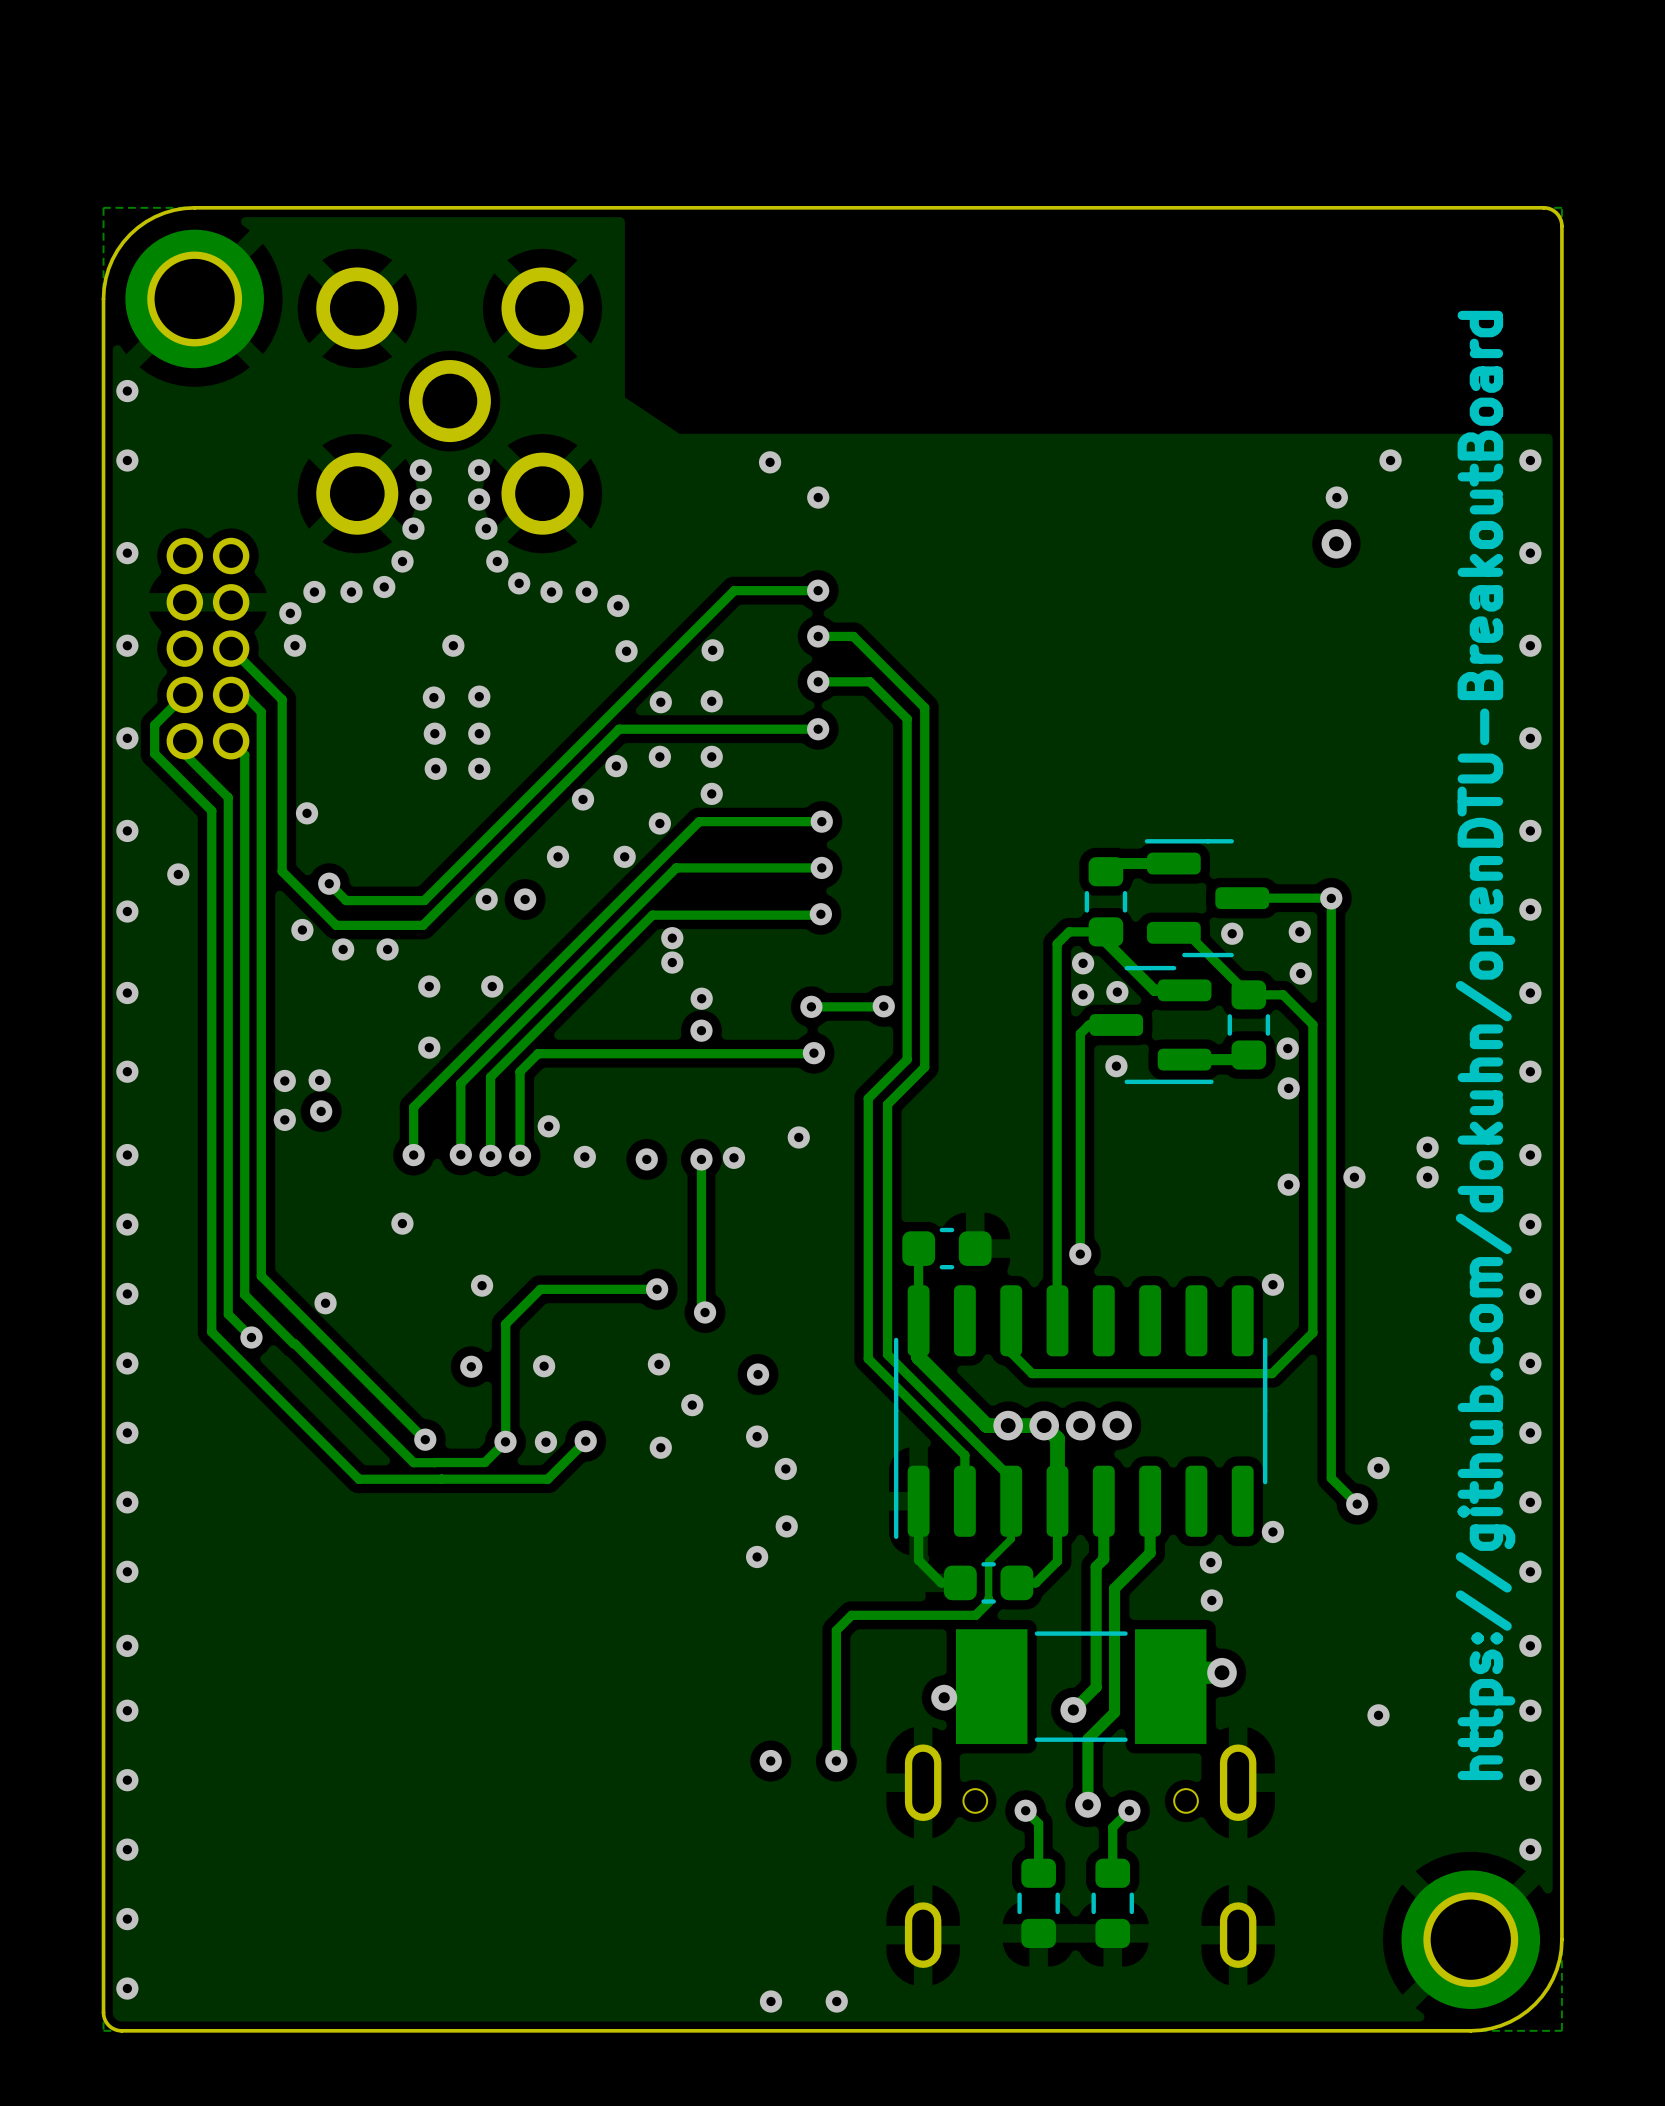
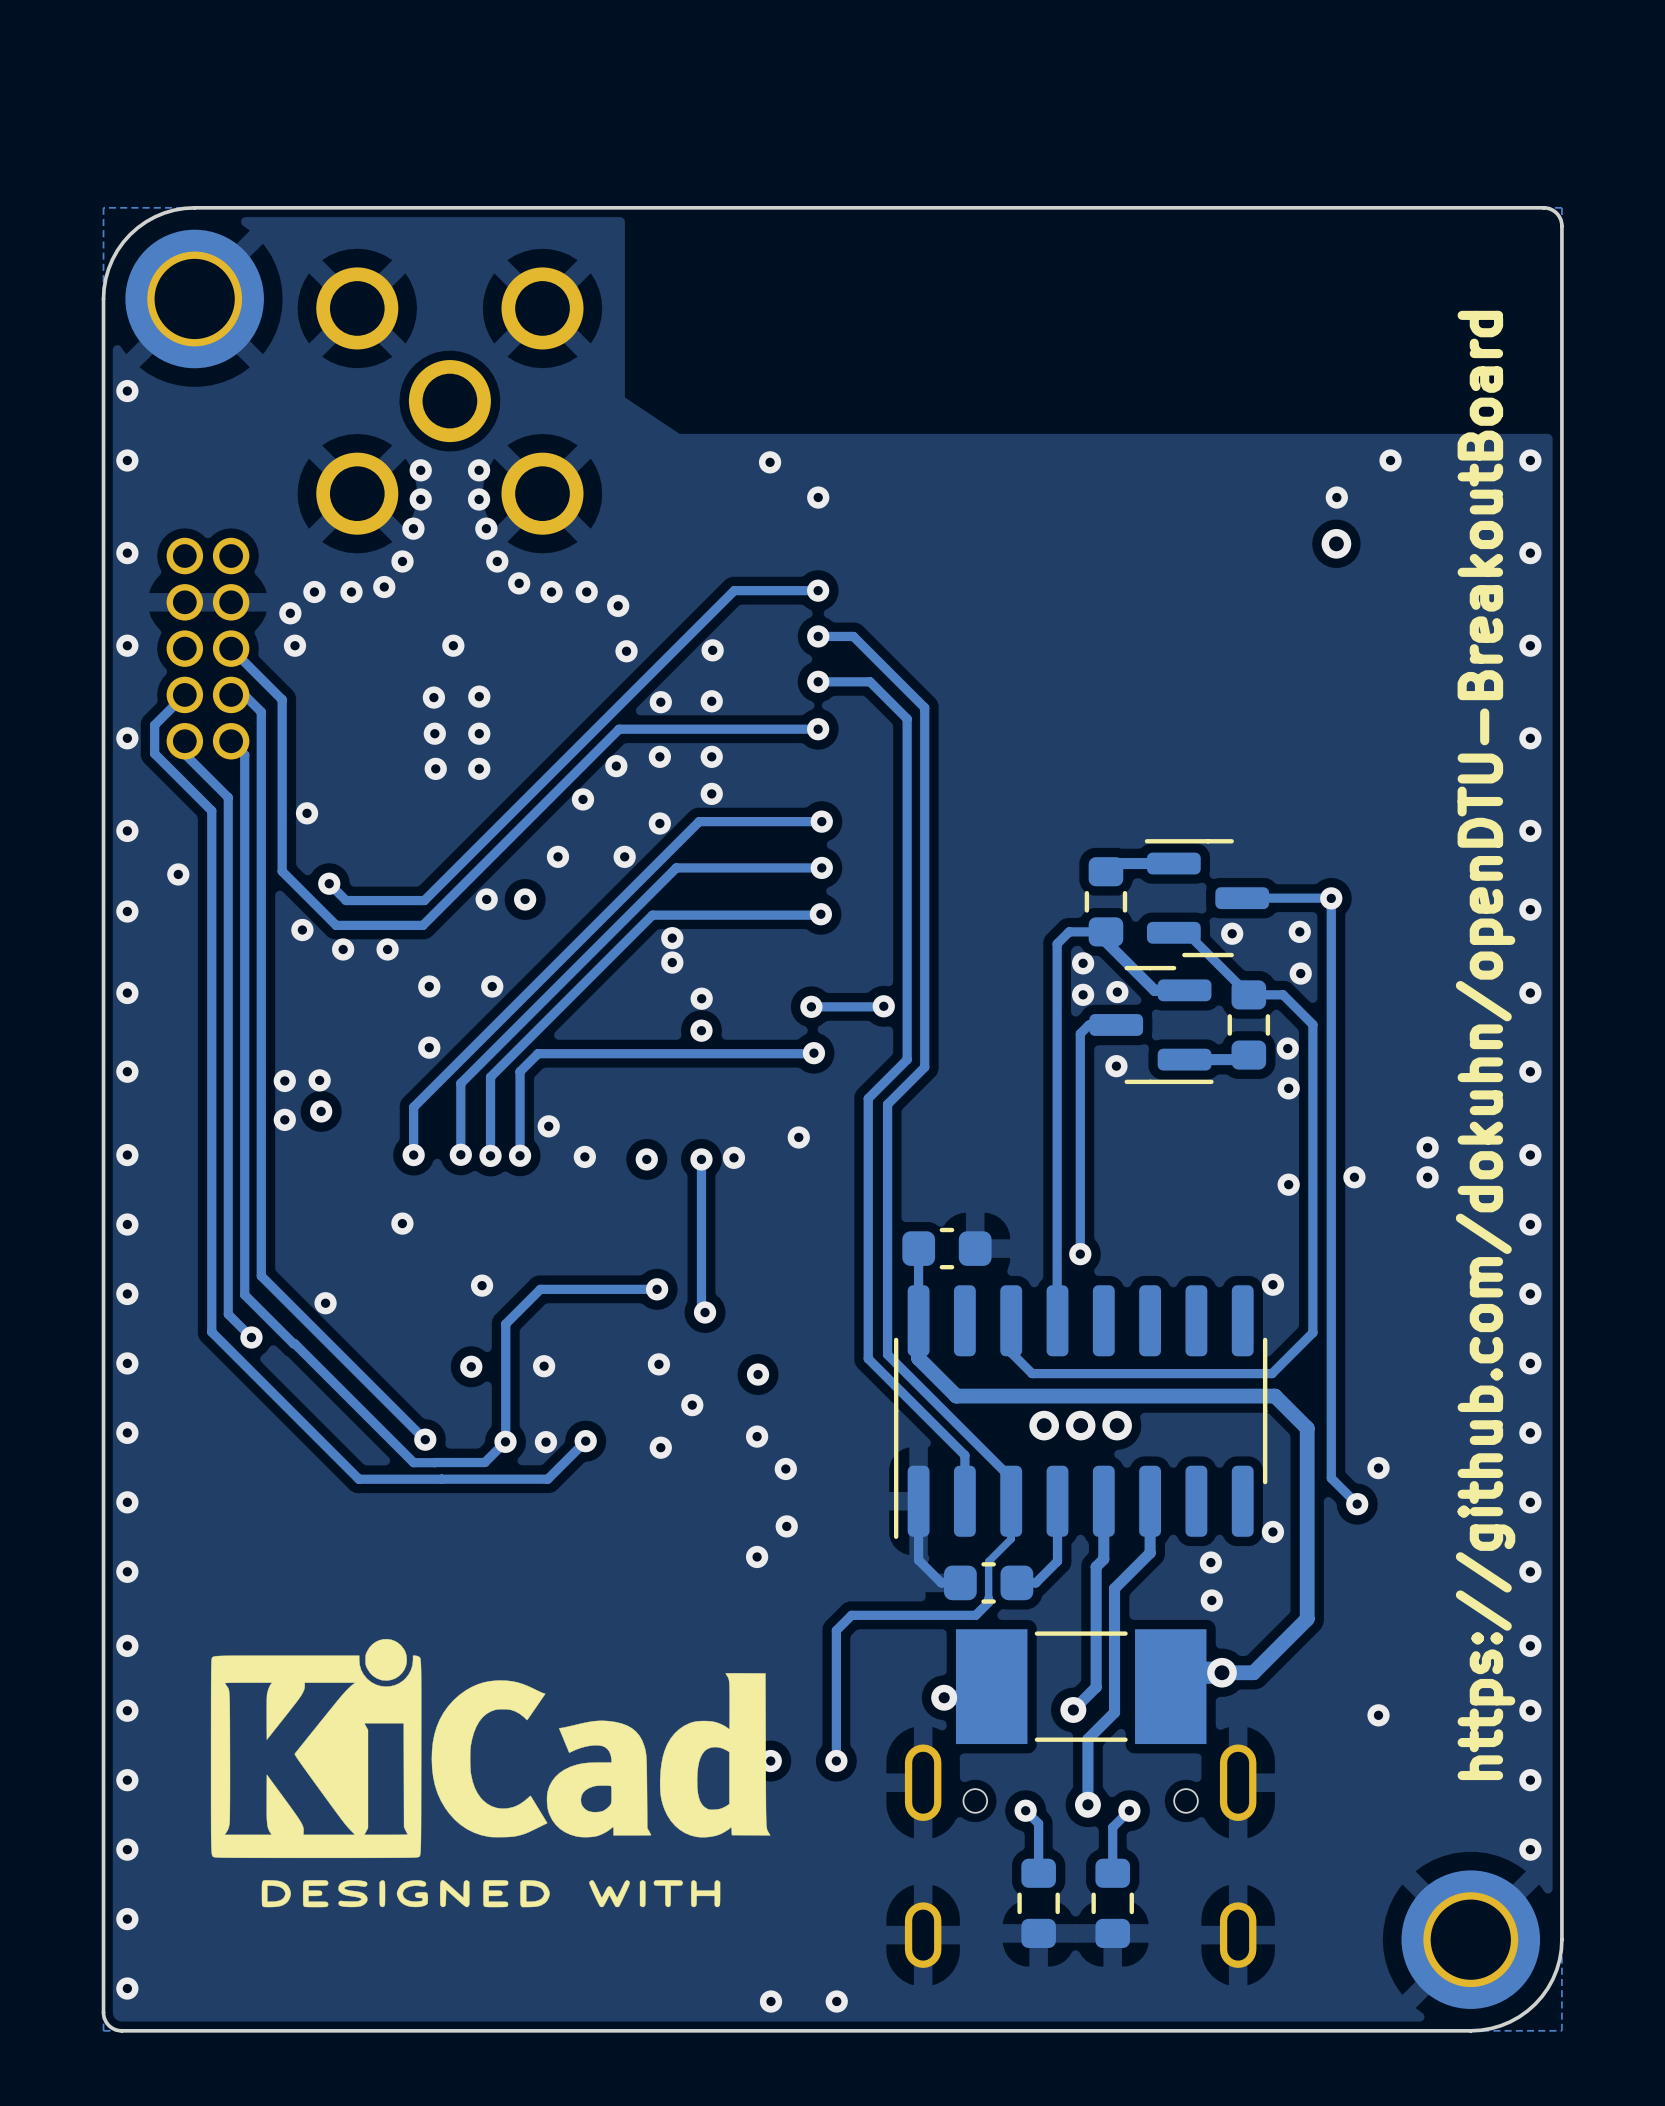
track: (918, 1357) (986, 1425) (1044, 1425) (1057, 1438) (1057, 1501) -> (918, 1357) (956, 1396) (1275, 1396) (1307, 1428) (1307, 1619) (1253, 1672) (1222, 1672)
via: (1008, 1425) -> none
drawing: none -> [210, 1638, 771, 1908]

